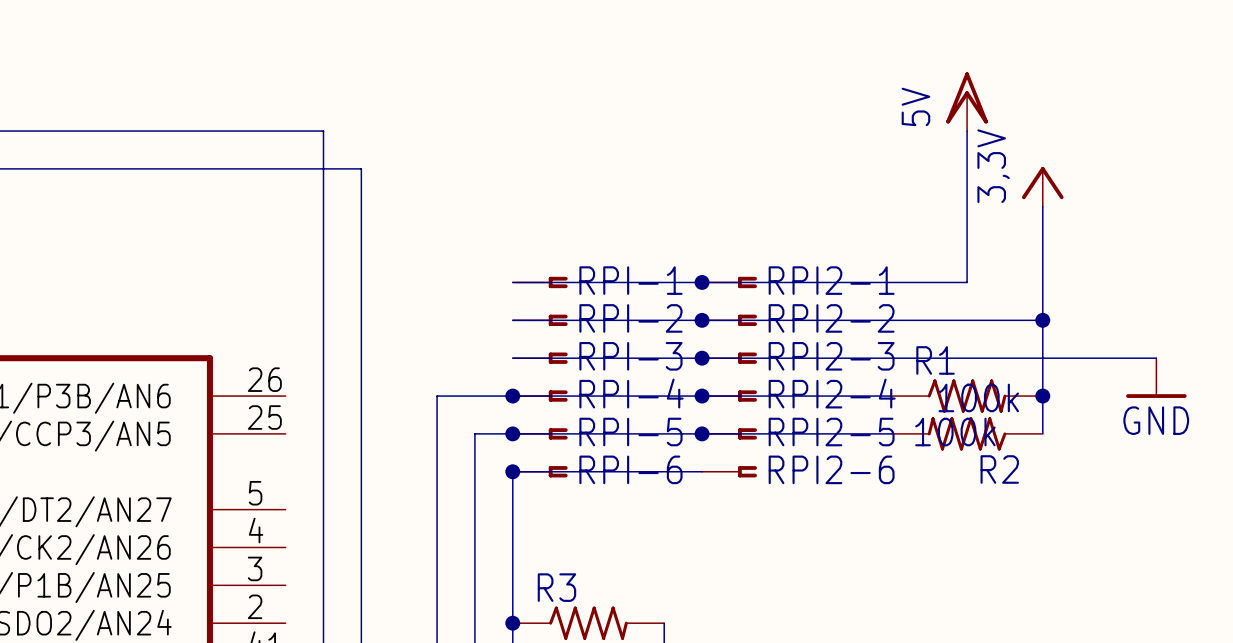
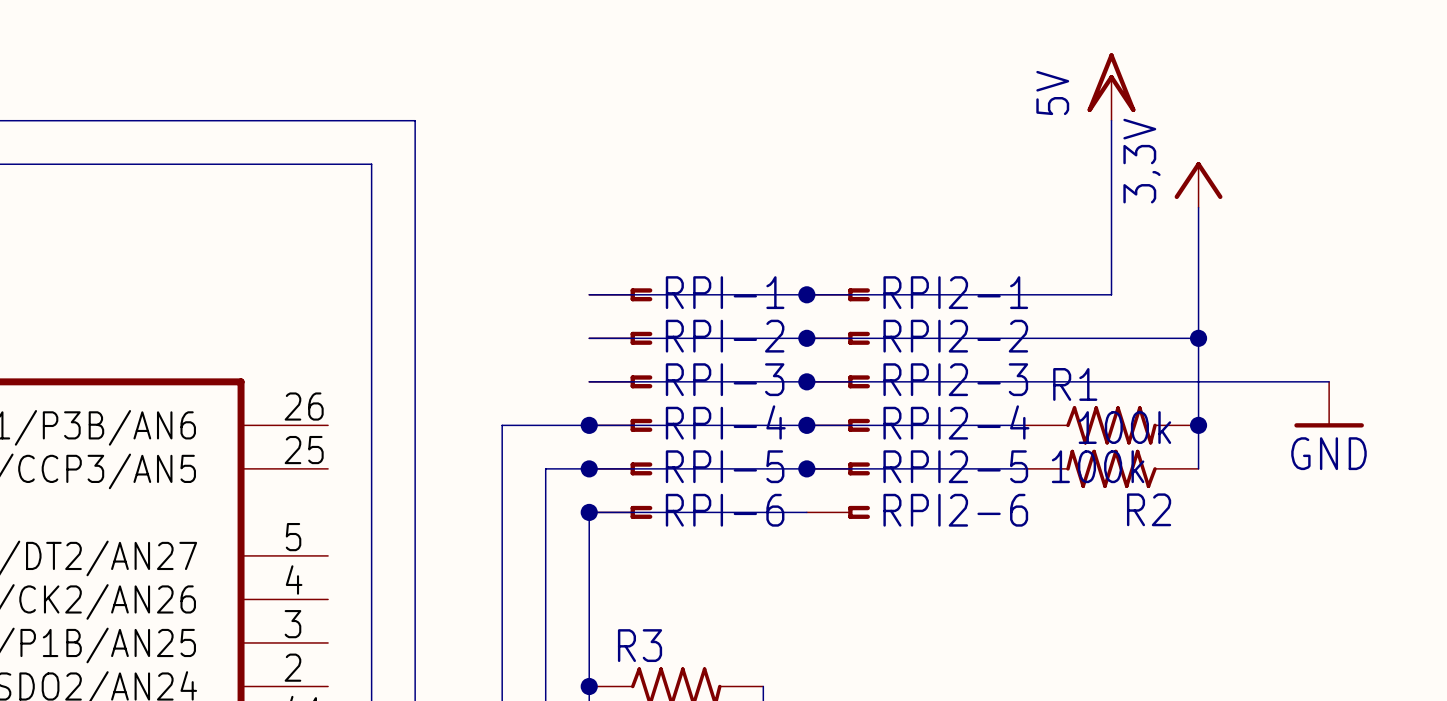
wire: (323, 131) (323, 168) (361, 168) -> (371, 120) (415, 120) (415, 164)

